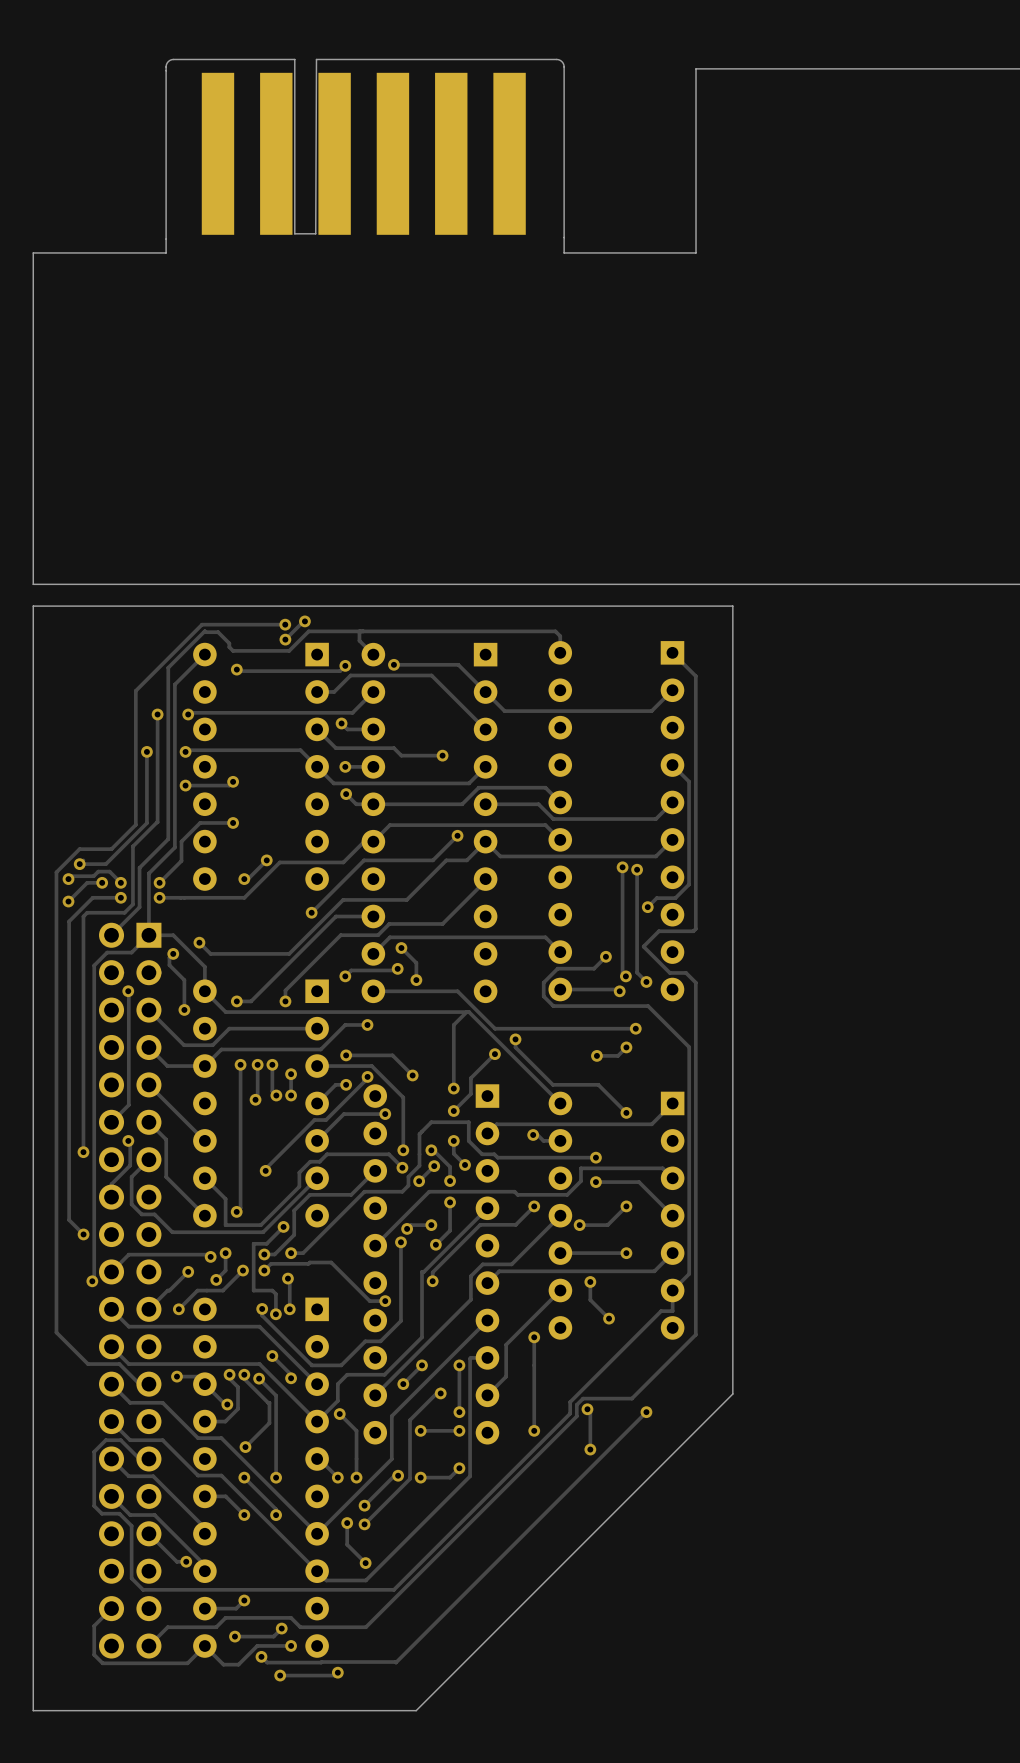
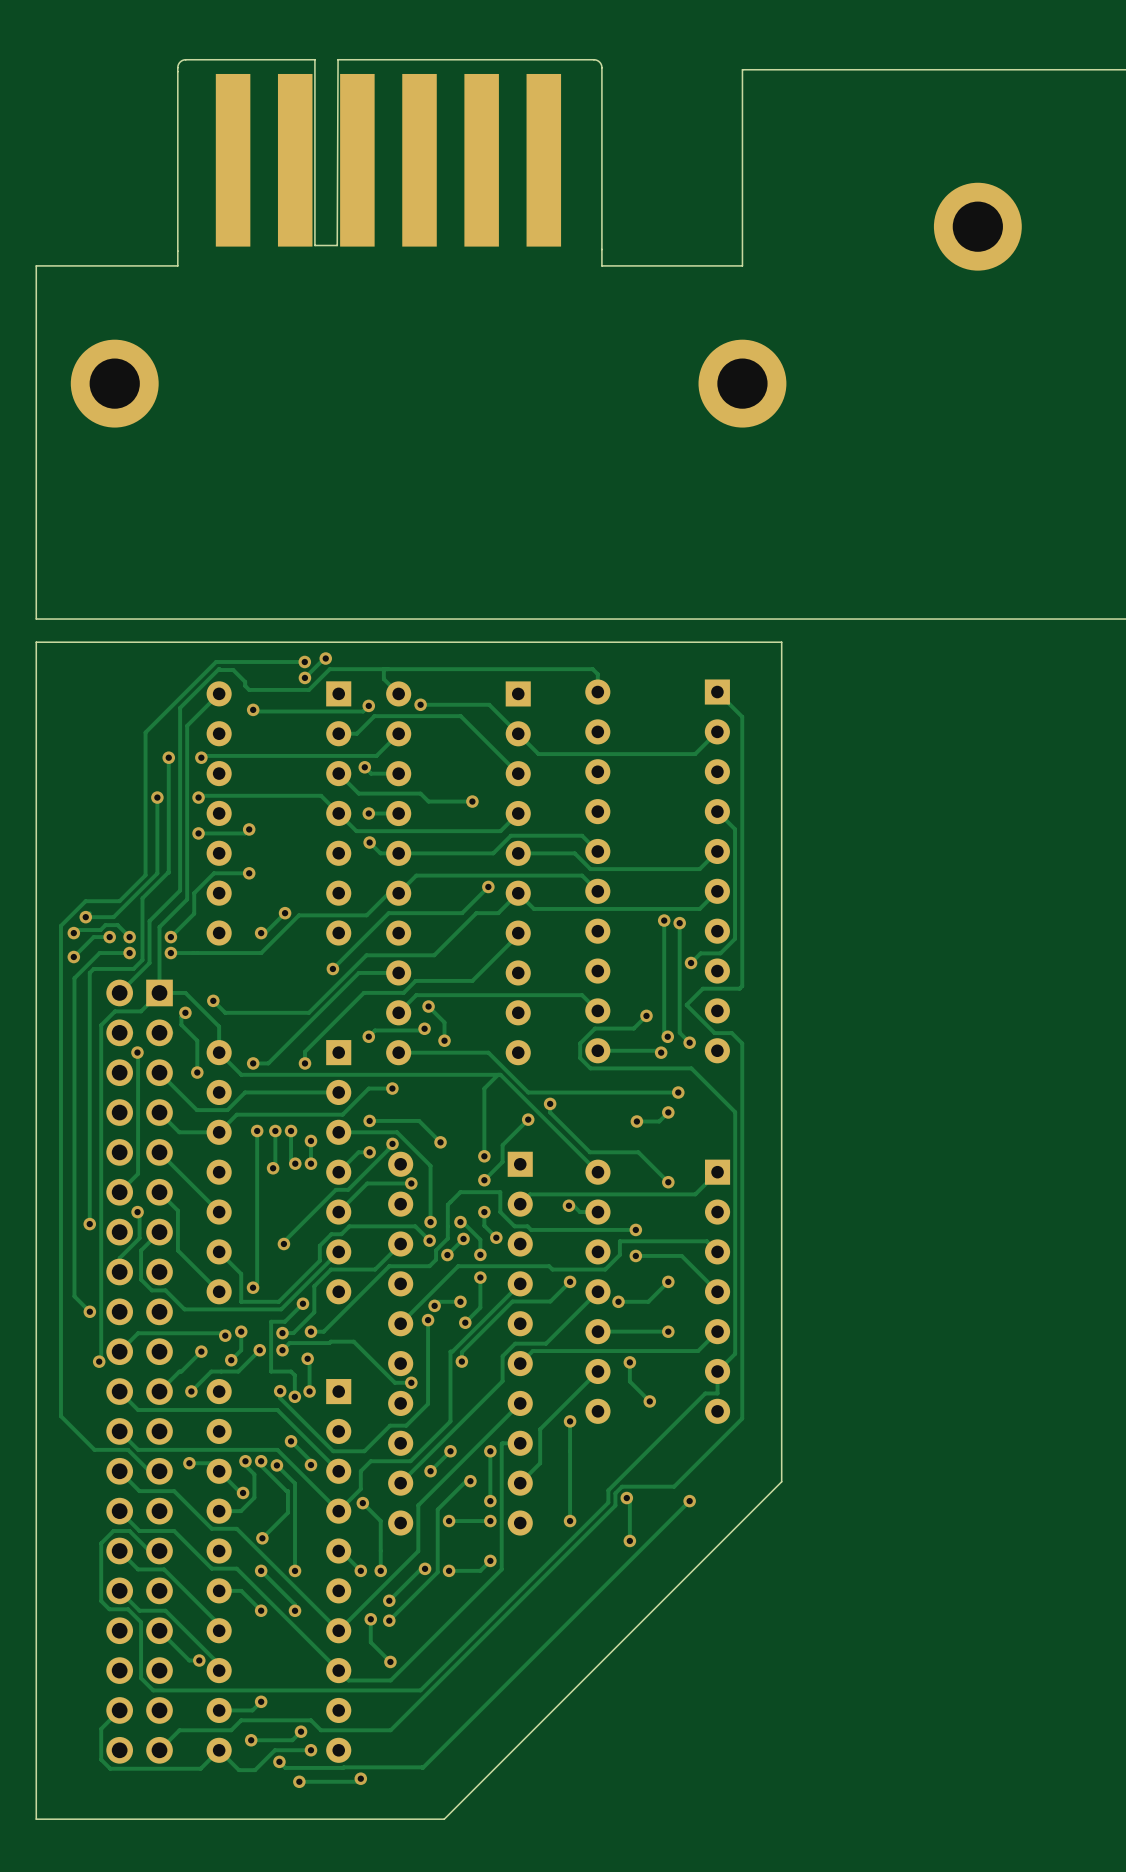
part: none -> (977, 226)
part: none -> (114, 383)
part: none -> (742, 383)

